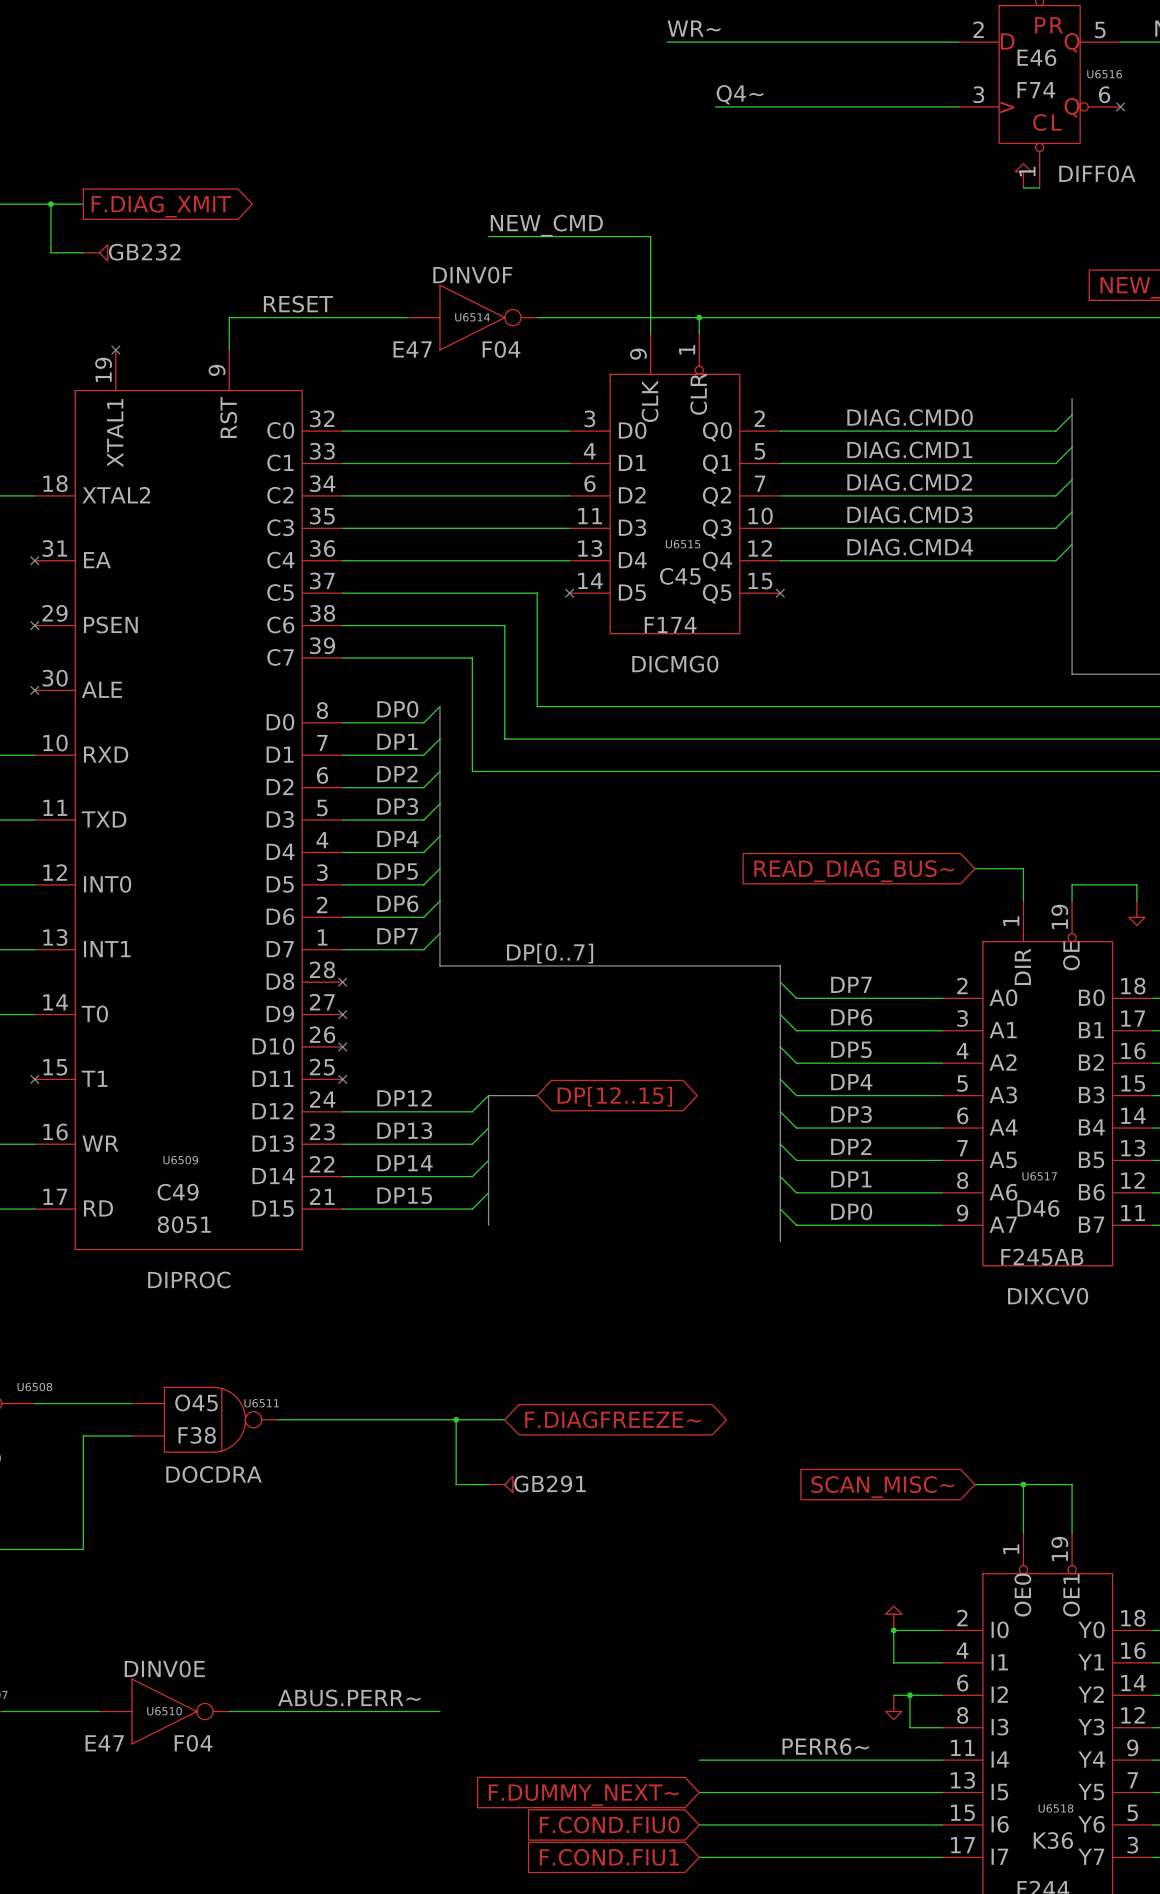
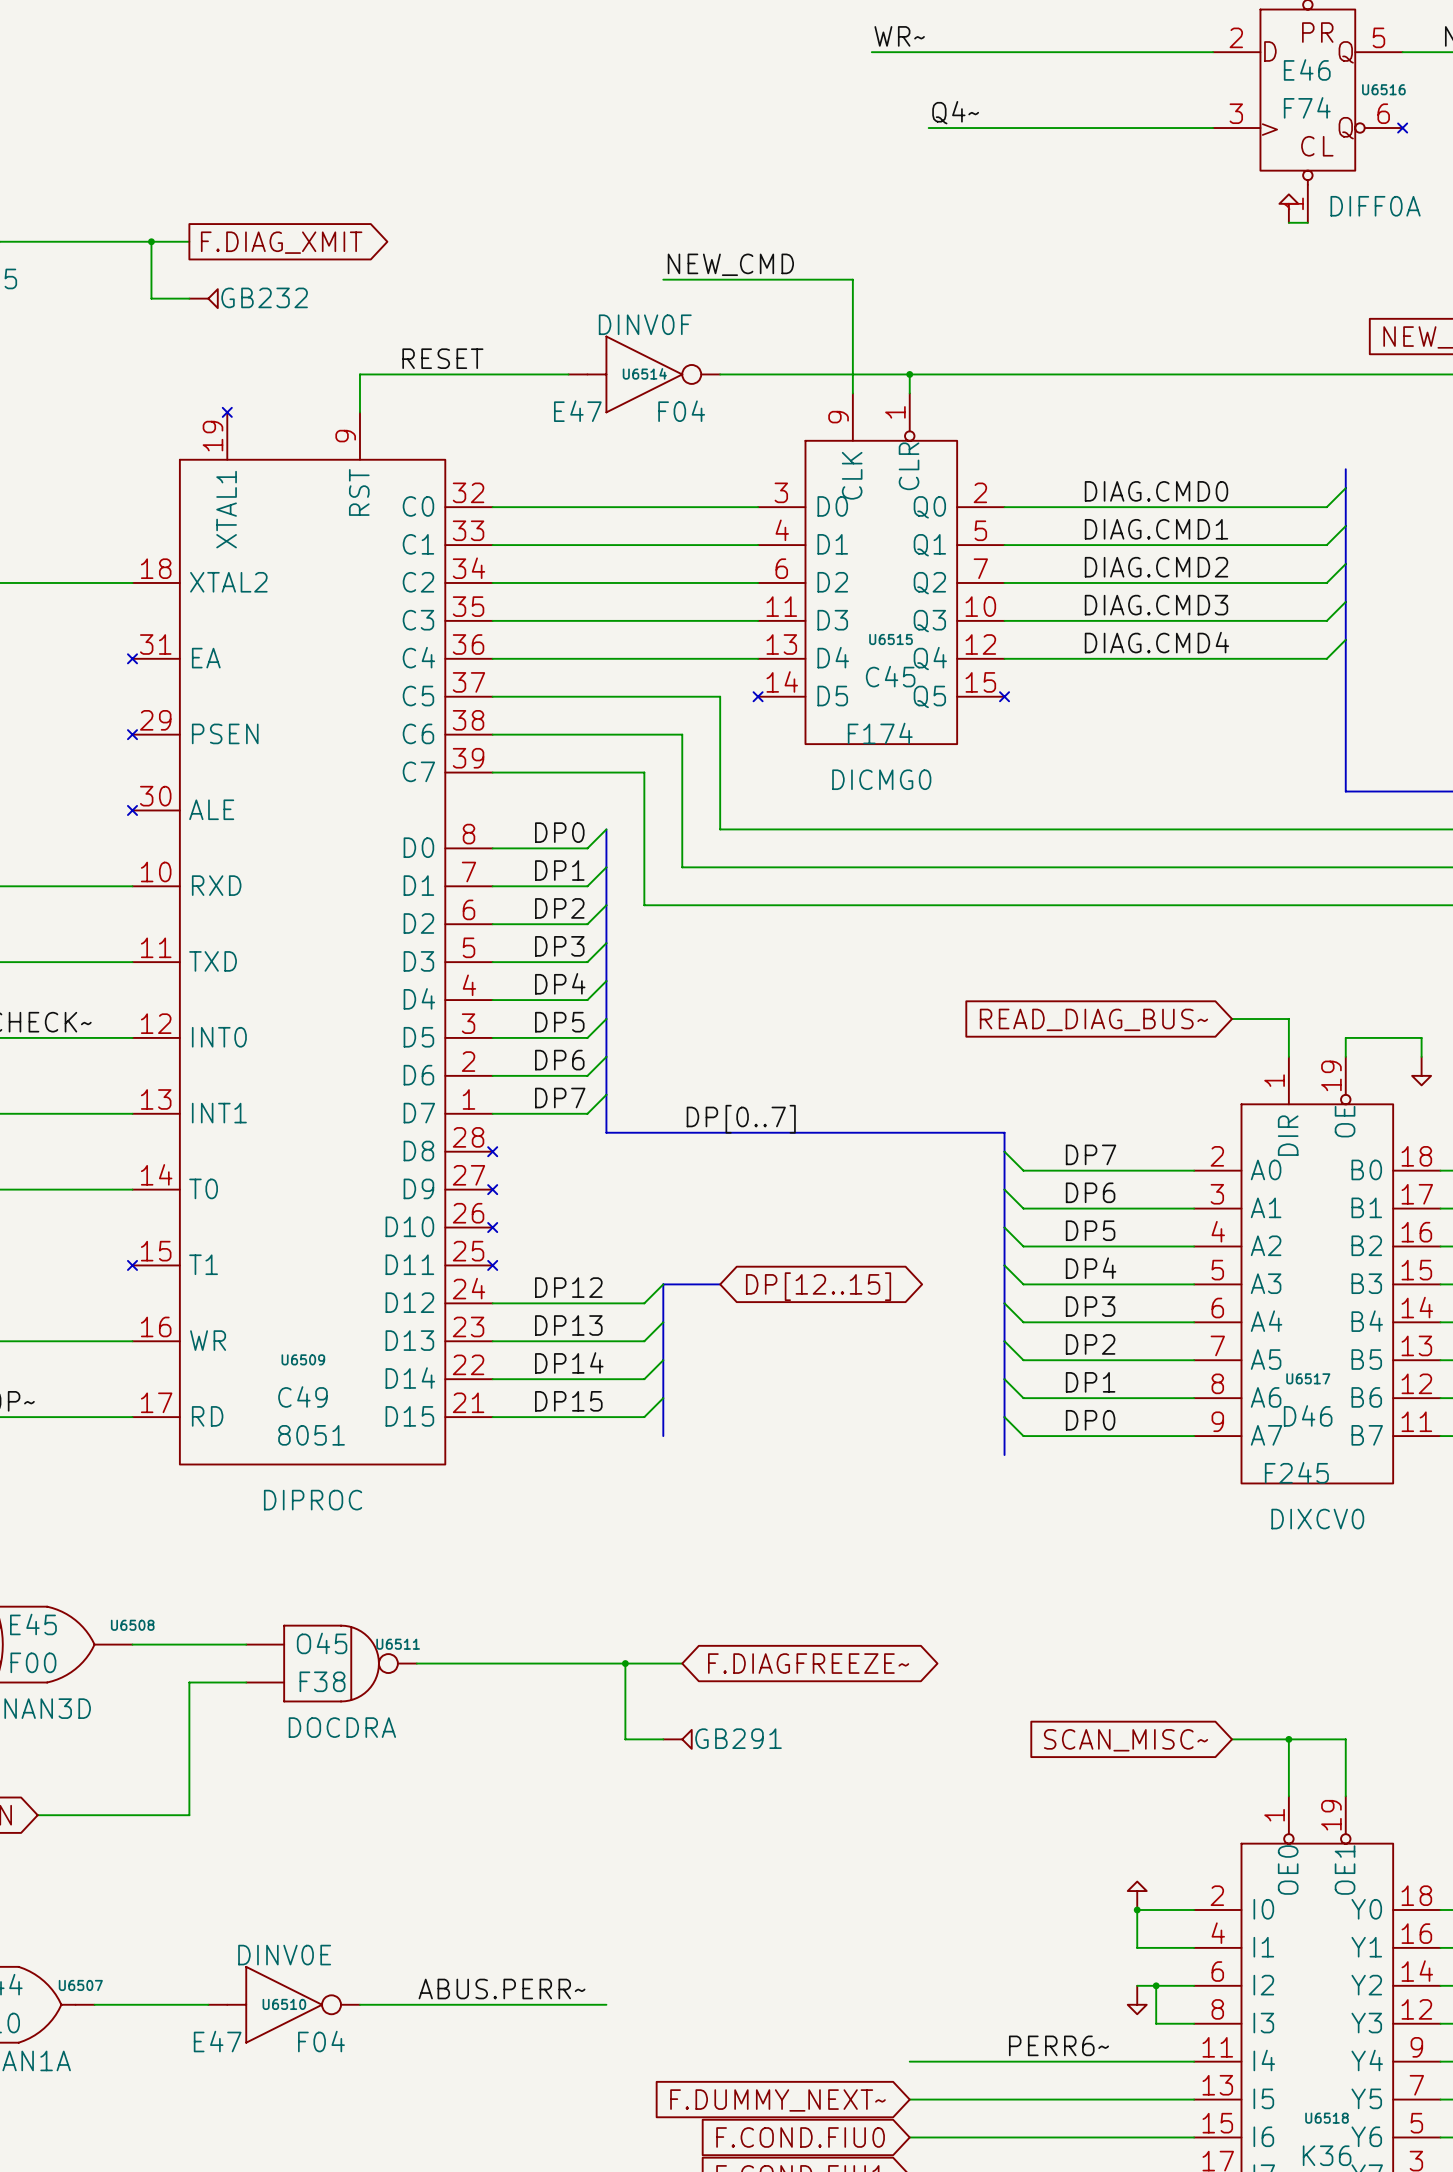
U6517 value: F245AB (1042, 1257) -> F245 (1296, 1472)

